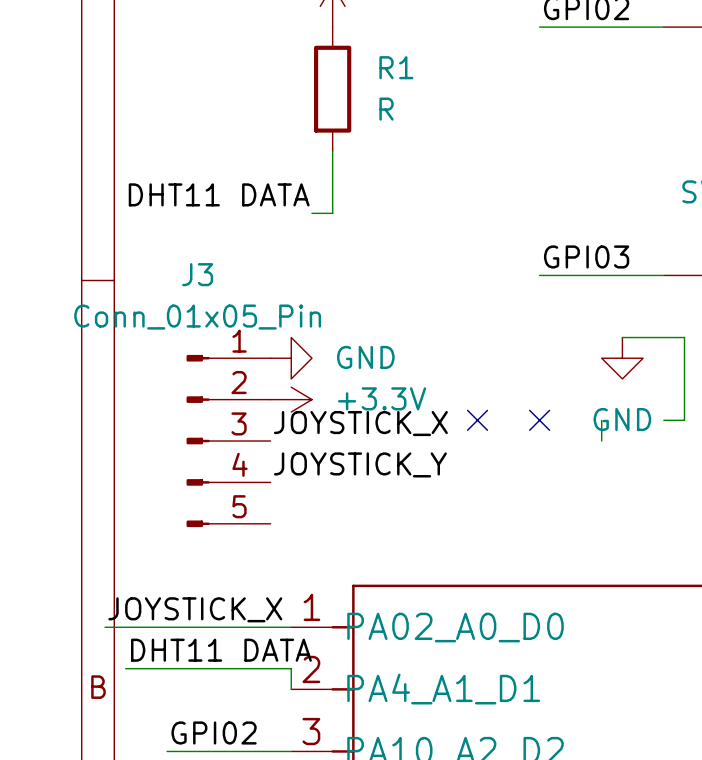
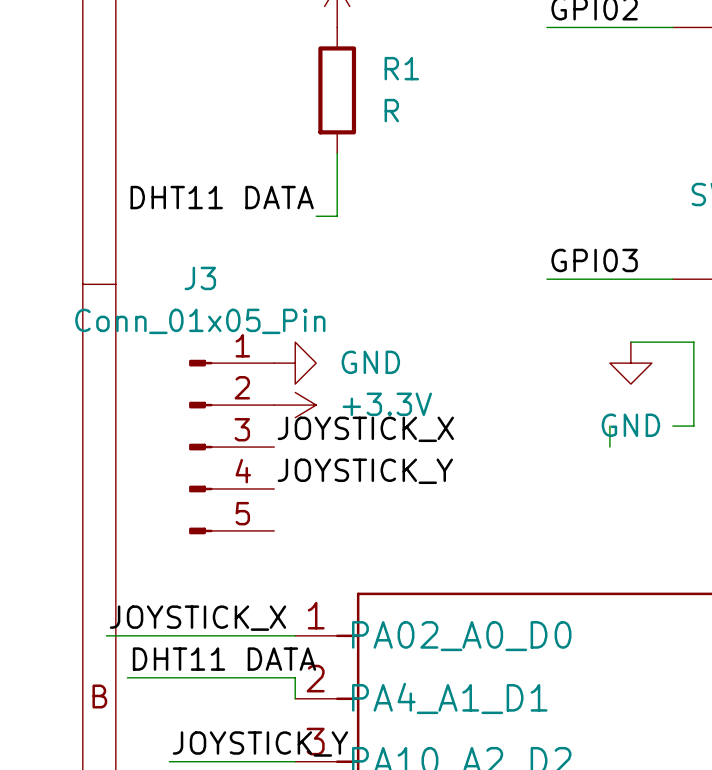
no-connect mark: (477, 420) -> none
no-connect mark: (539, 420) -> none
label: GPI02 (214, 732) -> JOYSTICK_Y (260, 743)

